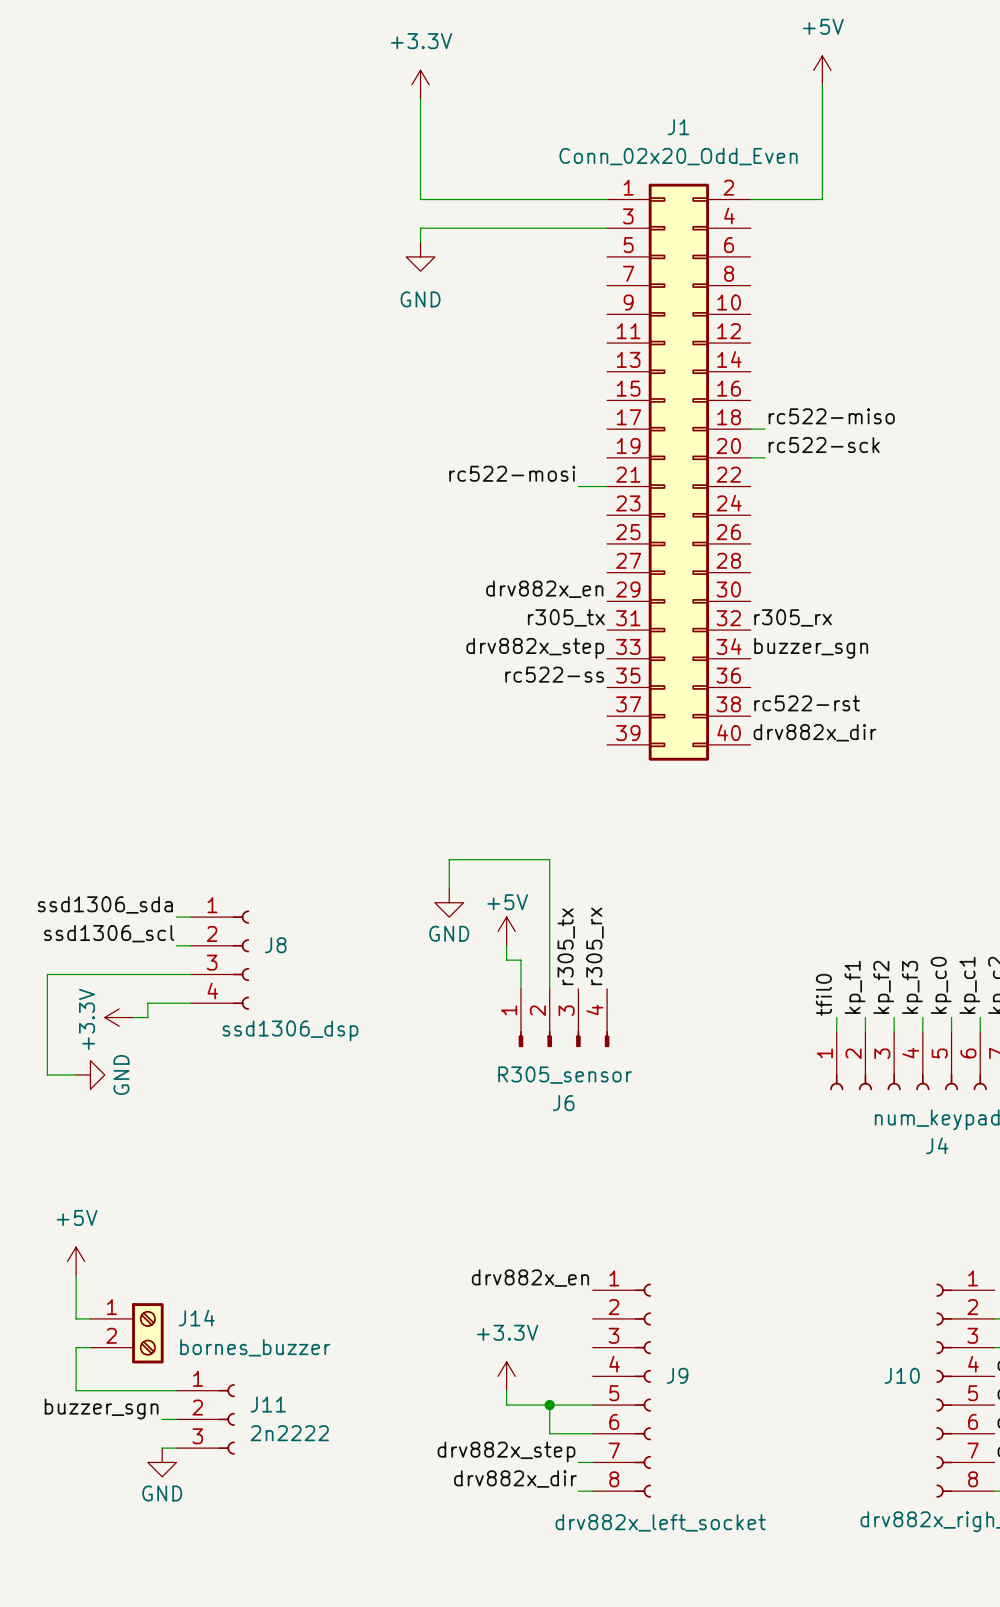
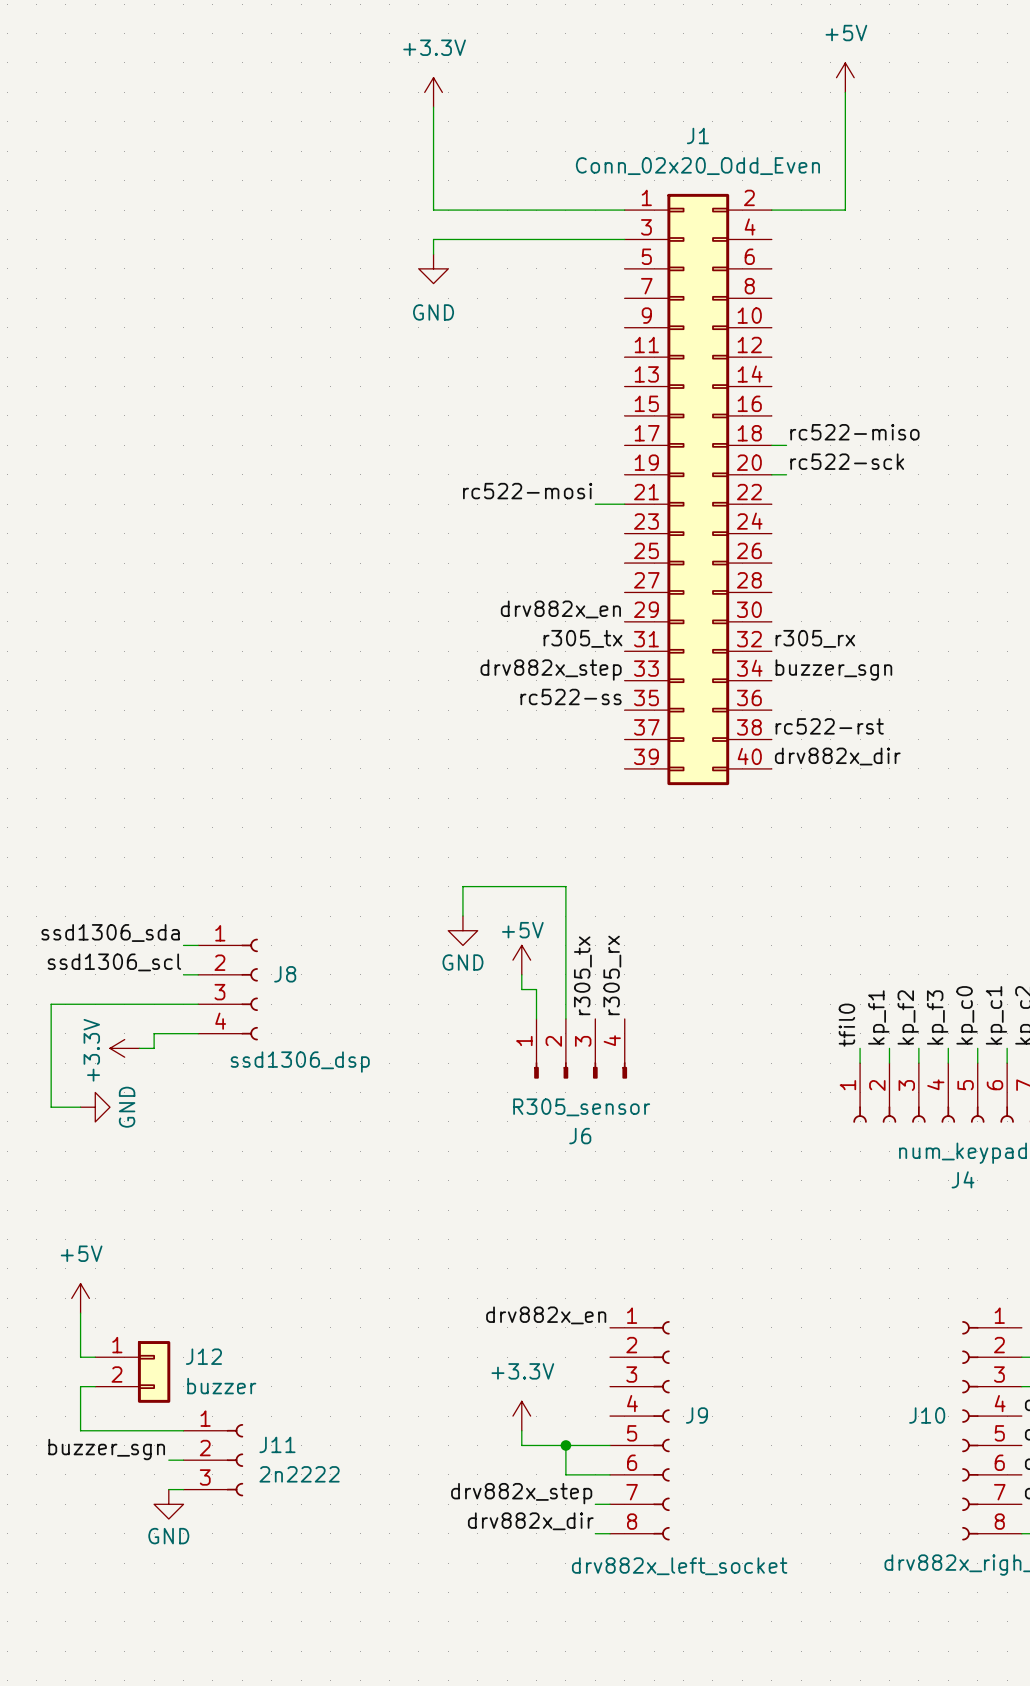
J14: bornes_buzzer (127, 1333) -> none
J12: none -> buzzer (132, 1371)

